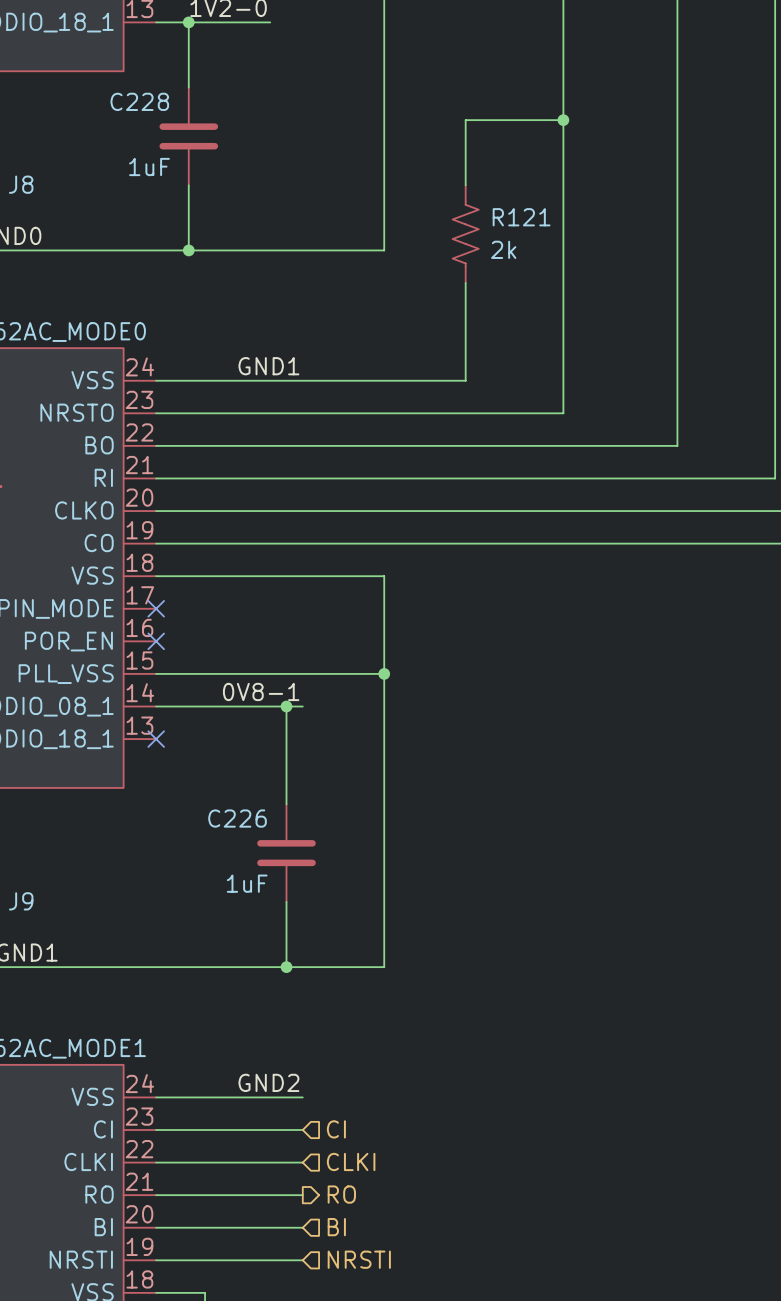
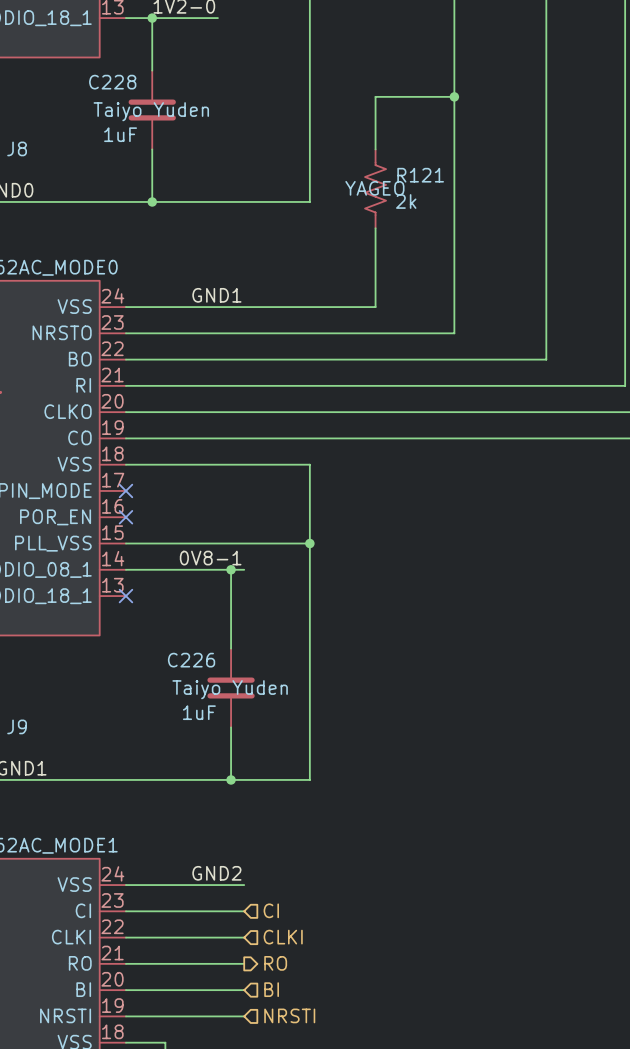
C228 text: none -> Taiyo Yuden (151, 111)
R121 text: none -> YAGEO (374, 188)
C226 text: none -> Taiyo Yuden (230, 689)

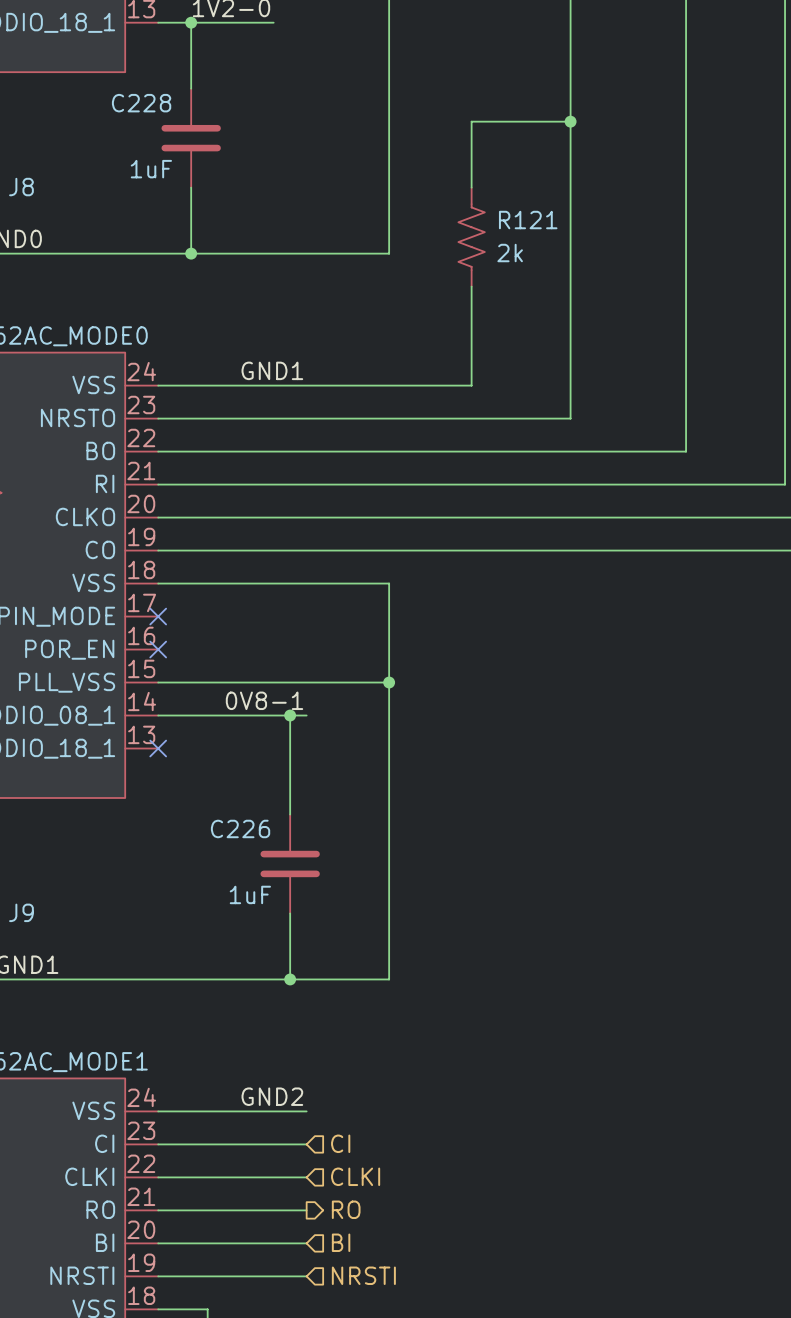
C228 text: Taiyo Yuden (151, 111) -> none
R121 text: YAGEO (374, 188) -> none
C226 text: Taiyo Yuden (230, 689) -> none

